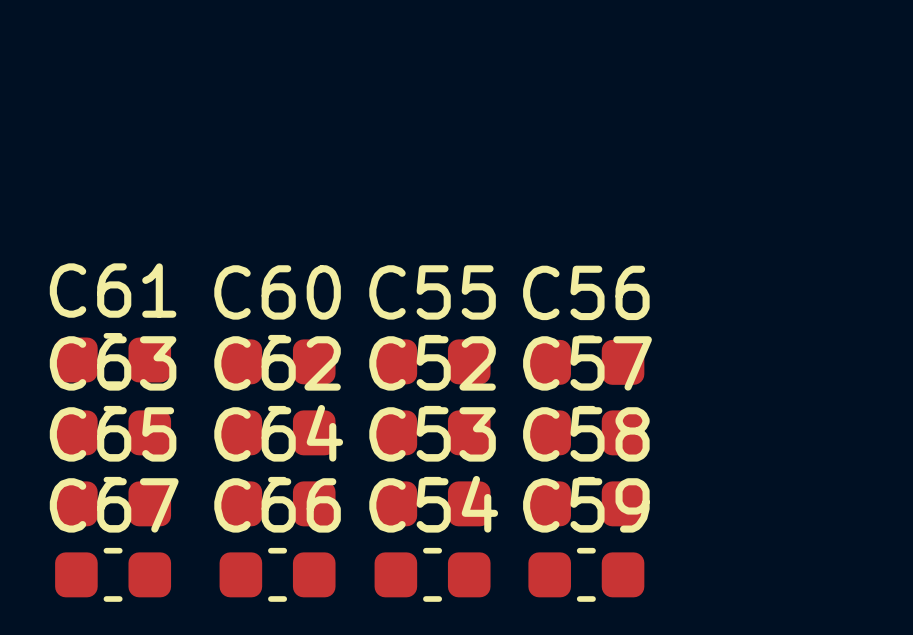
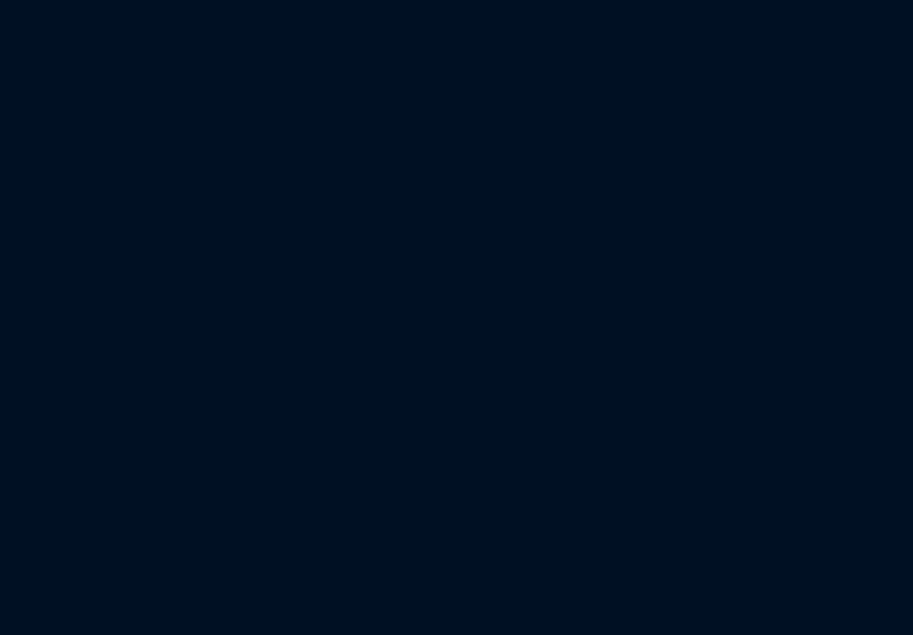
C61: (113, 359) -> none
C60: (277, 361) -> none
C55: (432, 361) -> none
C56: (586, 362) -> none
C63: (113, 432) -> none
C62: (277, 432) -> none
C52: (432, 432) -> none
C57: (586, 432) -> none
C65: (113, 503) -> none
C64: (277, 503) -> none
C53: (432, 503) -> none
C58: (586, 503) -> none
C67: (113, 574) -> none
C66: (277, 574) -> none
C54: (432, 574) -> none
C59: (586, 574) -> none

